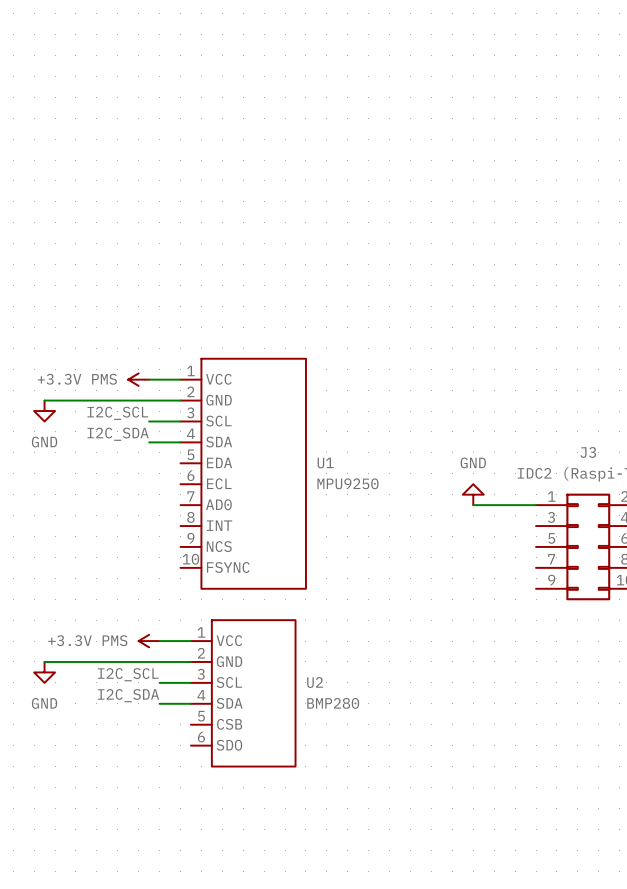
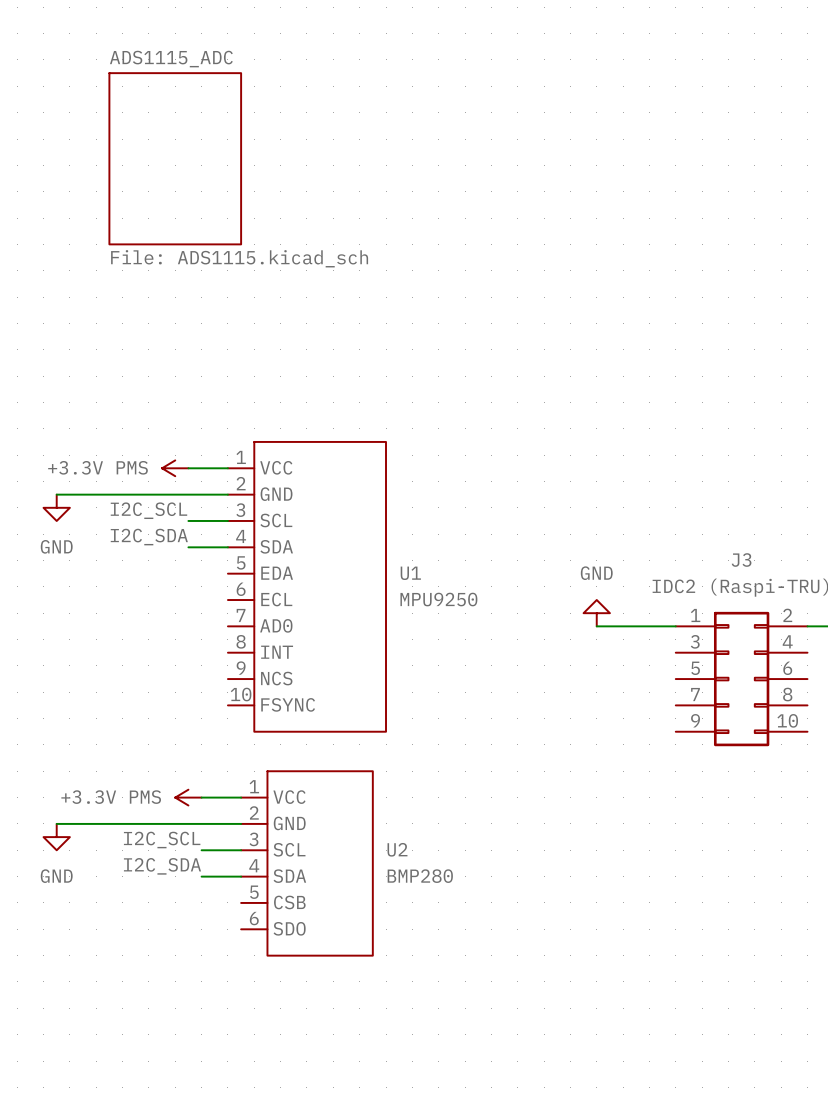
sheet ADS1115_ADC: none -> File: ADS1115.kicad_sch (175, 158)

